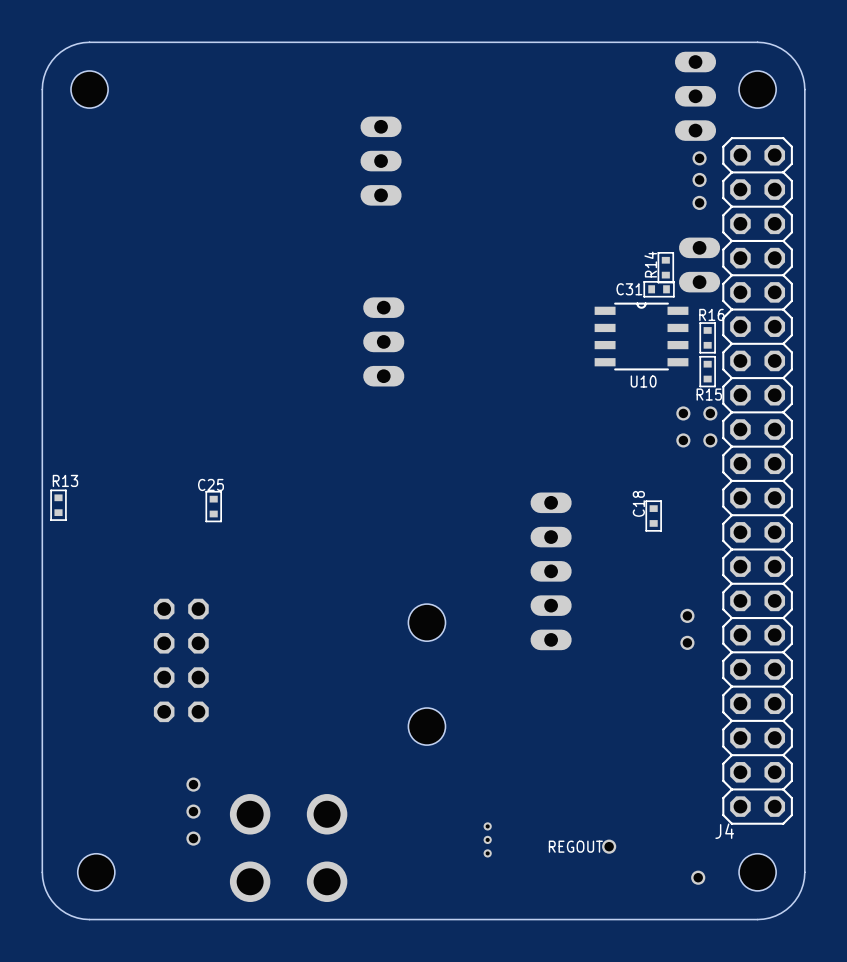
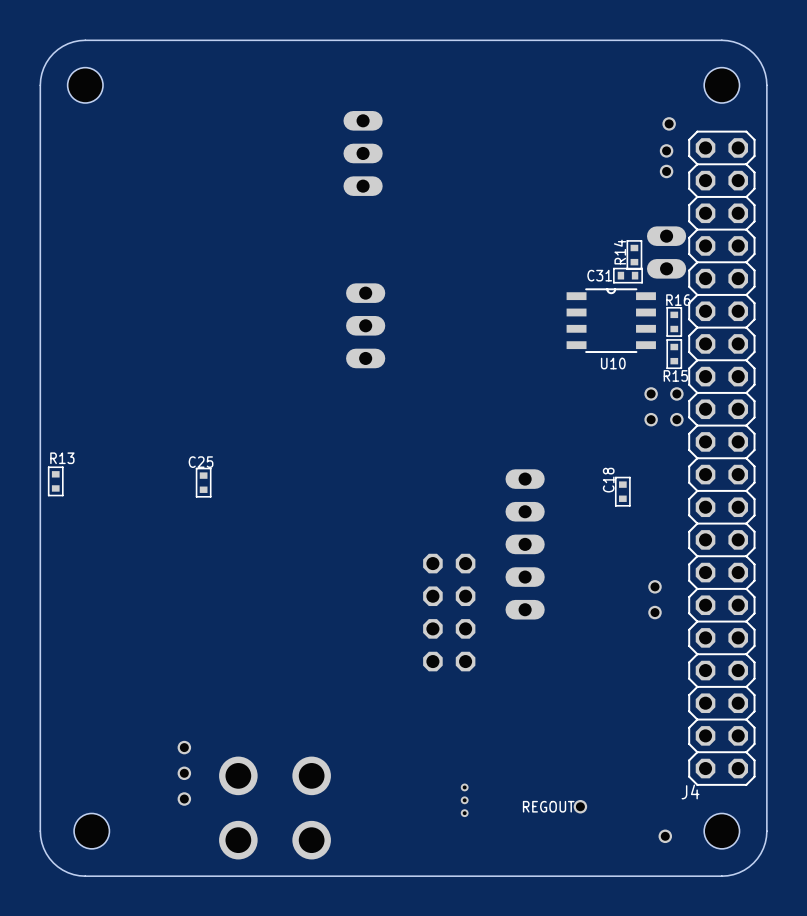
part: (695, 96) -> none
part position: (699, 202) -> (669, 123)
hole: (426, 622) -> none
part position: (181, 660) -> (449, 612)
hole: (426, 726) -> none

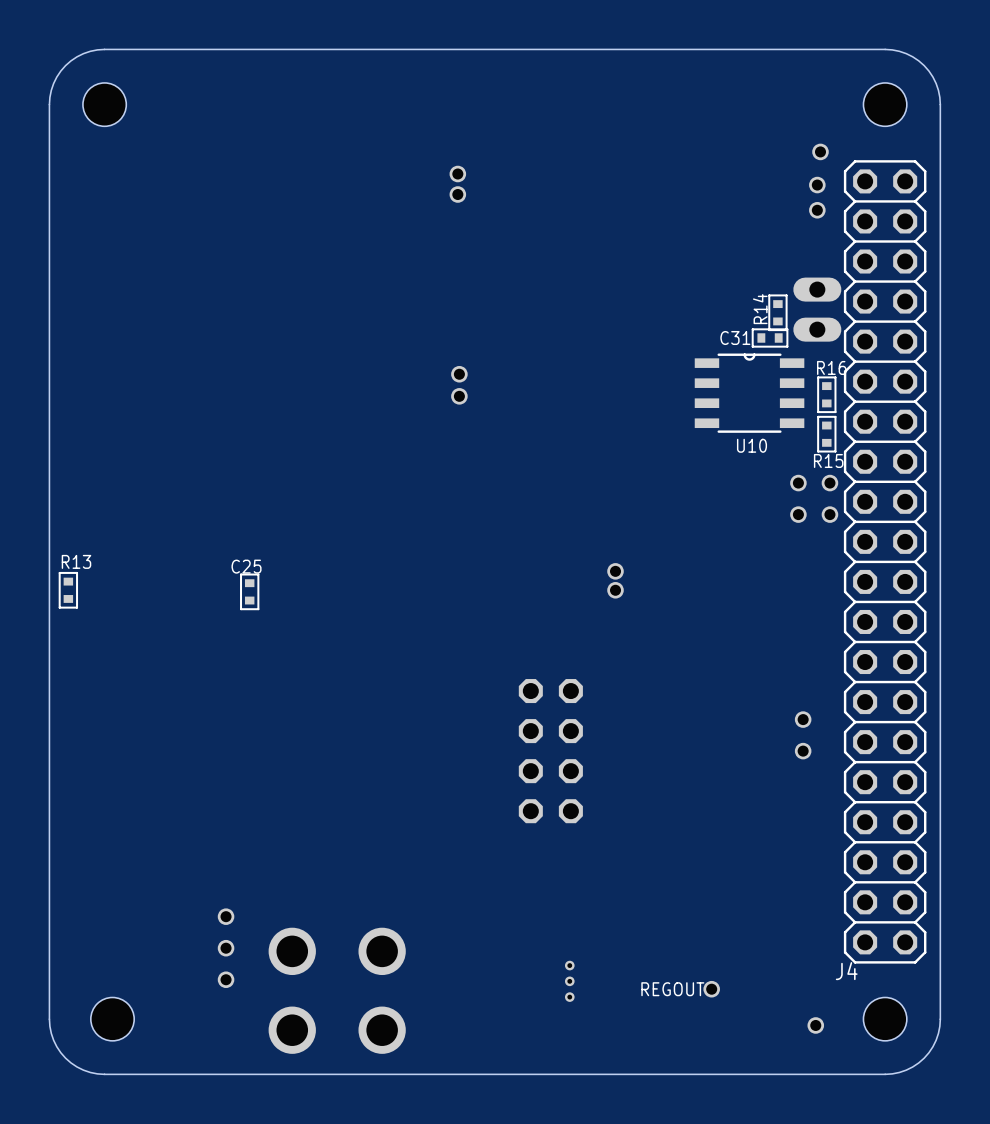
part: none -> (457, 174)
part: (363, 153) -> none
part: none -> (457, 194)
part footprint: [346, 283, 386, 369] -> [451, 388, 468, 405]
part: none -> (459, 374)
part: none -> (615, 571)
part: none -> (615, 590)
C18: (622, 491) -> none
part: (525, 544) -> none

